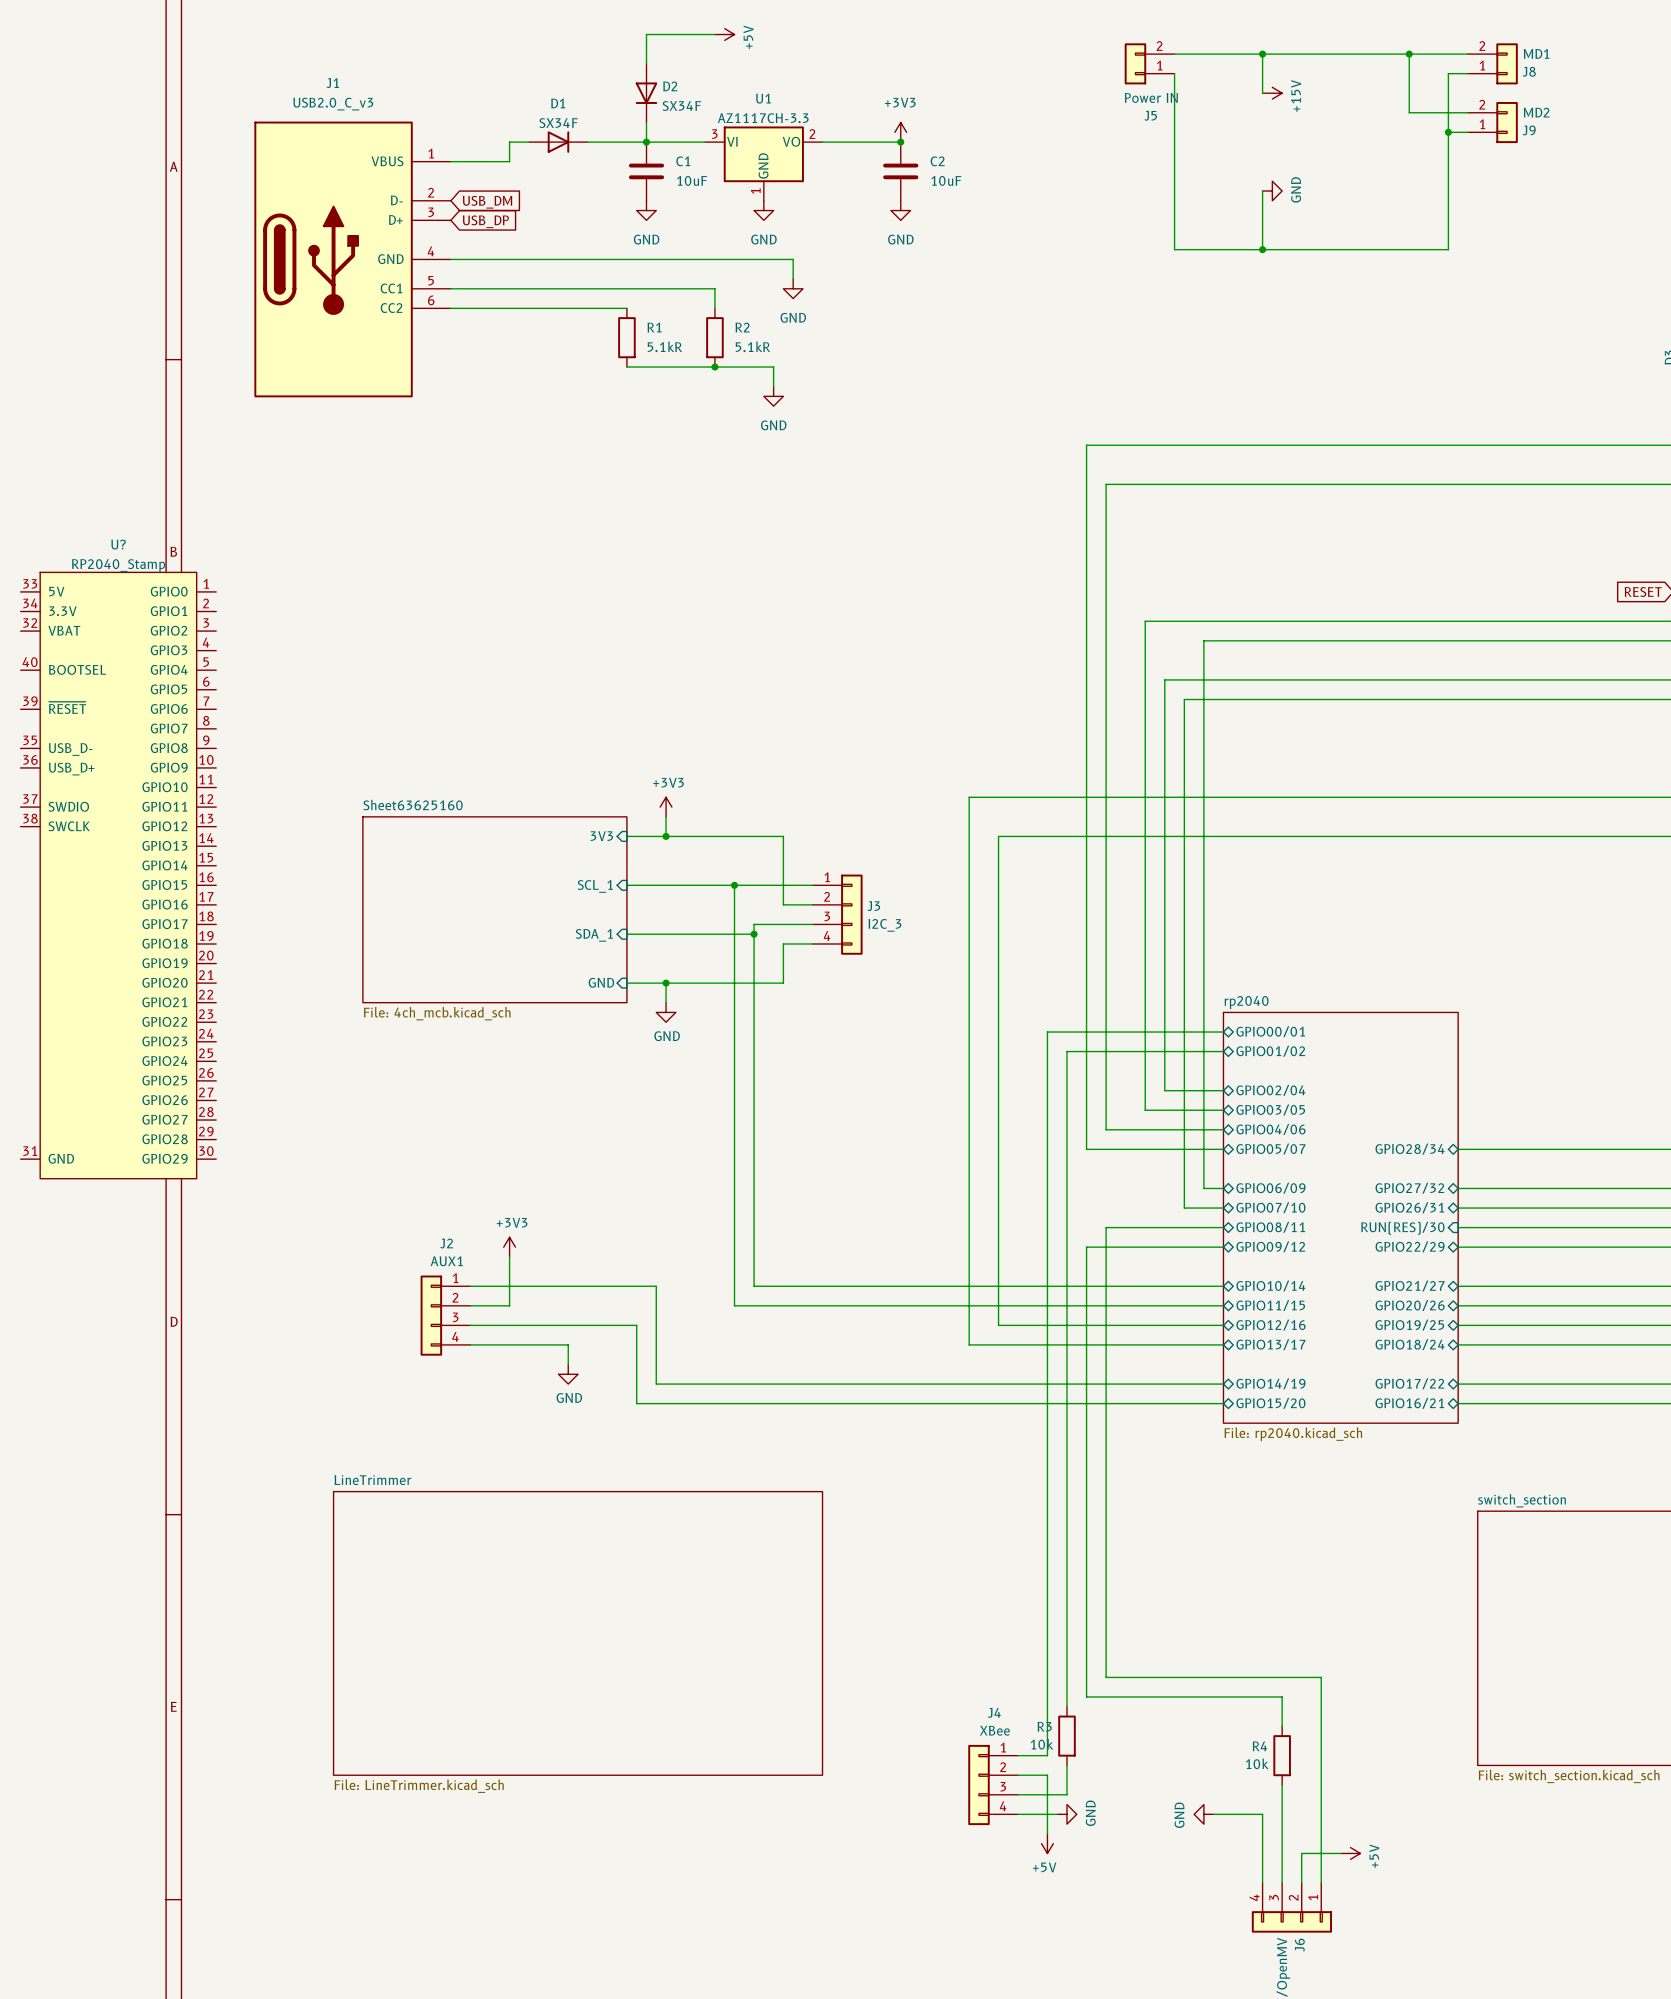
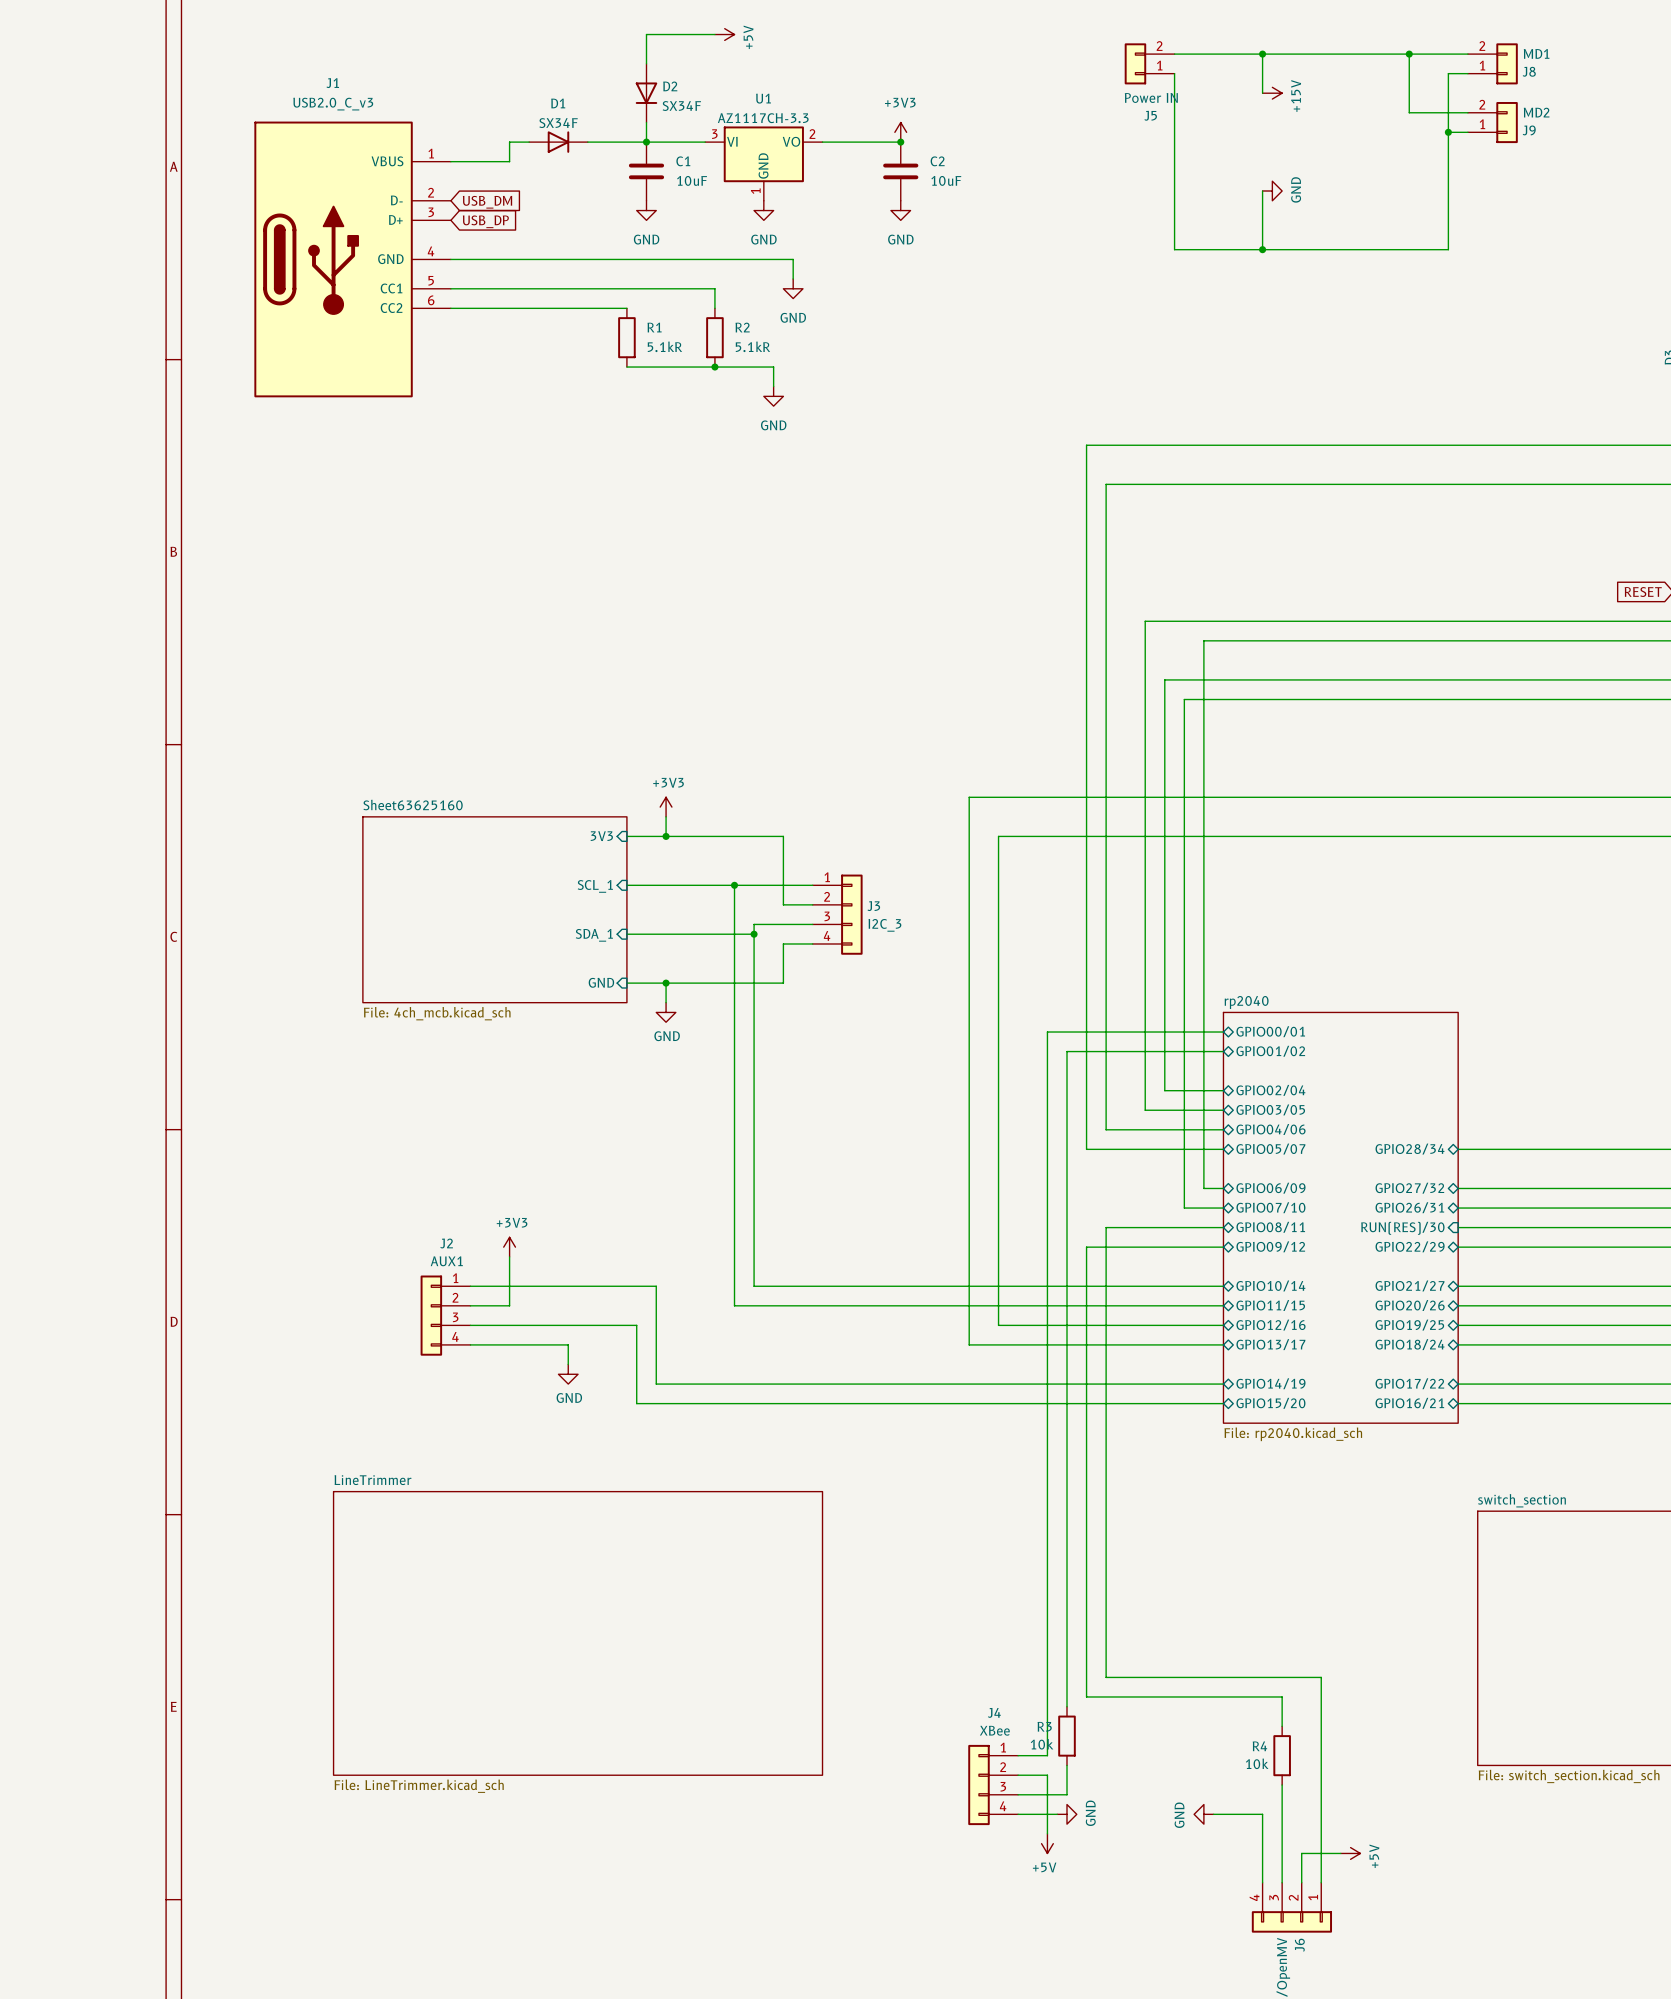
U?: RP2040_Stamp (118, 875) -> none

